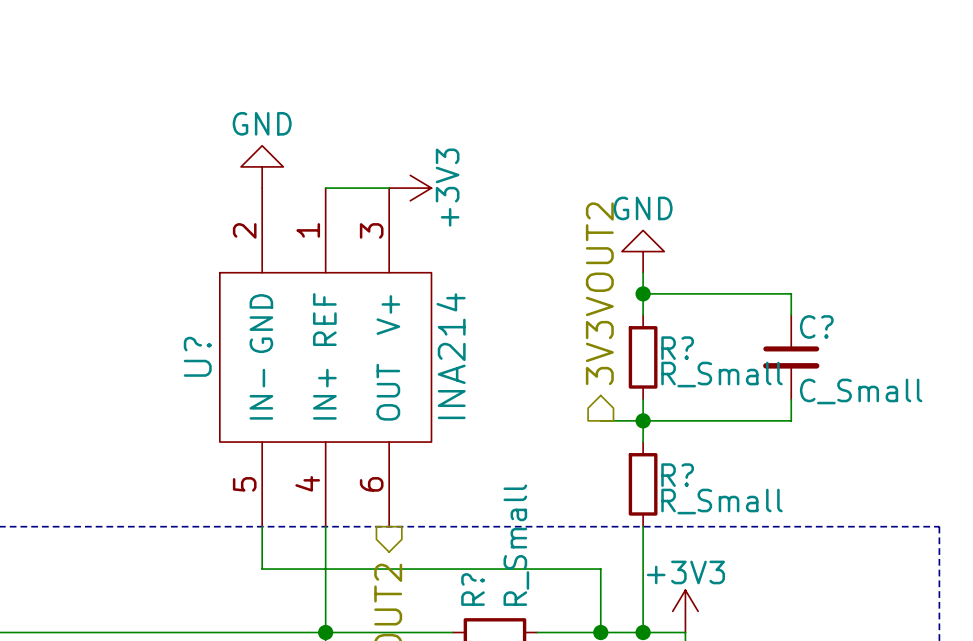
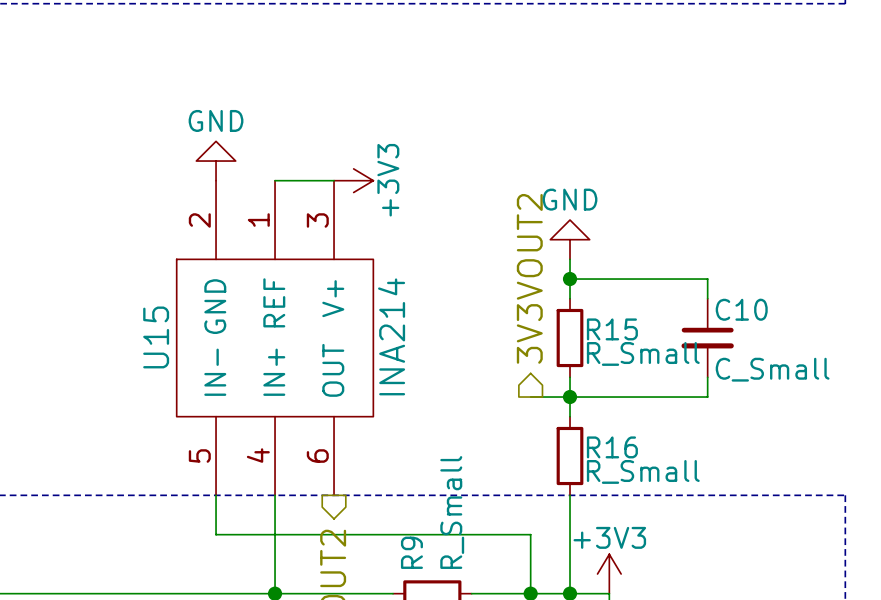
C? name: C? (816, 326) -> C10 (741, 309)
R? name: R? (677, 348) -> R15 (612, 329)
U? name: U? (197, 356) -> U15 (156, 337)
R? name: R? (677, 475) -> R16 (612, 447)
R? name: R? (473, 589) -> R9 (411, 552)

